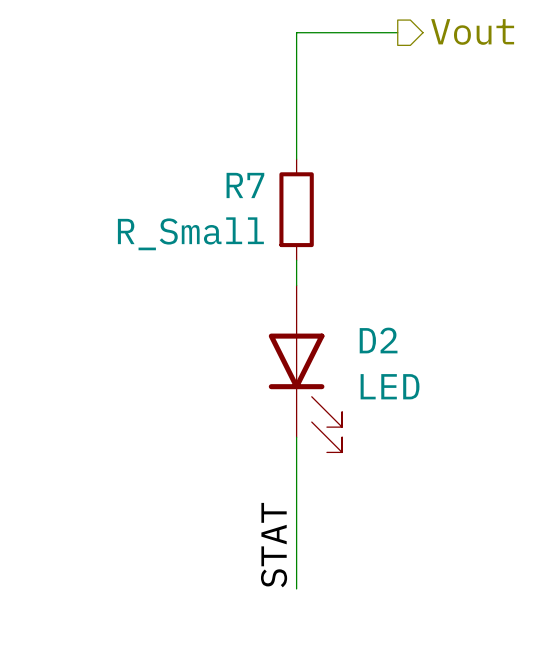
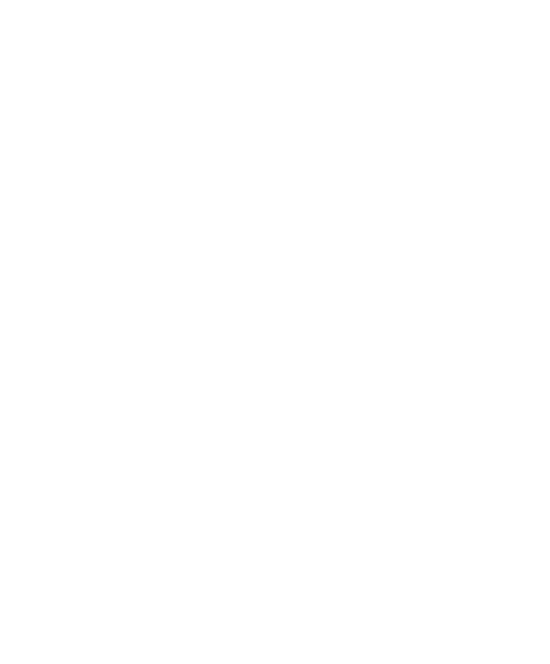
hierarchical label: Vout (472, 31) -> none
wire: (397, 32) (296, 32) (296, 159) -> none
R7: R_Small (296, 209) -> none
wire: (296, 260) (296, 285) -> none
D2: LED (305, 368) -> none
wire: (296, 437) (296, 588) -> none
label: STAT (274, 545) -> none

